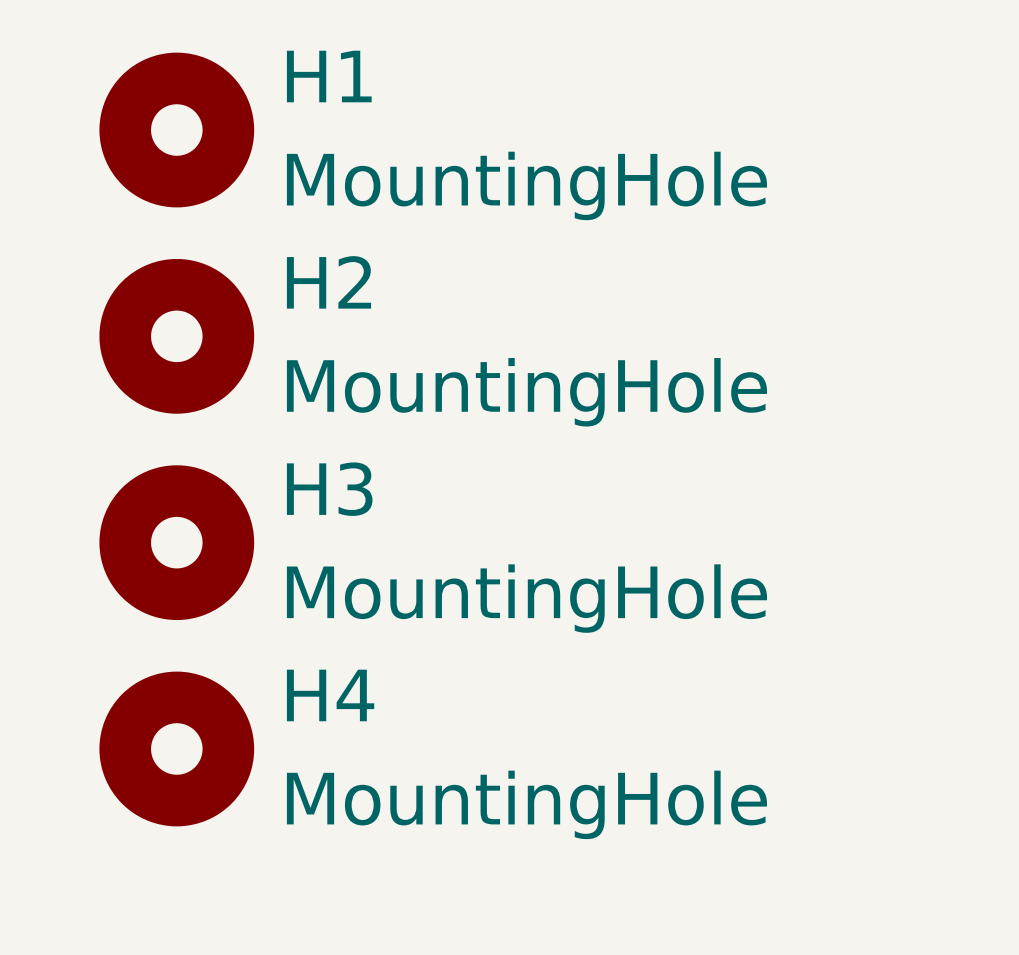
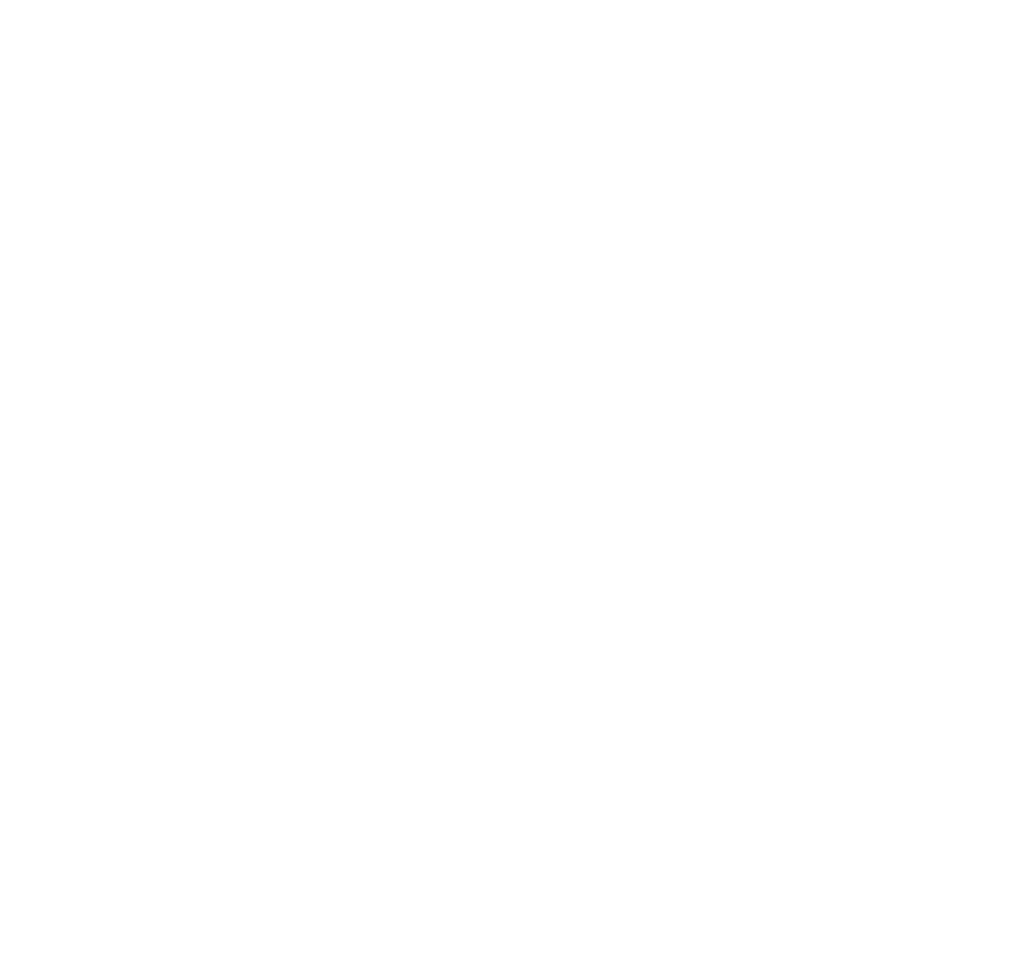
H1: MountingHole (176, 130) -> none
H2: MountingHole (176, 336) -> none
H3: MountingHole (176, 542) -> none
H4: MountingHole (176, 748) -> none

